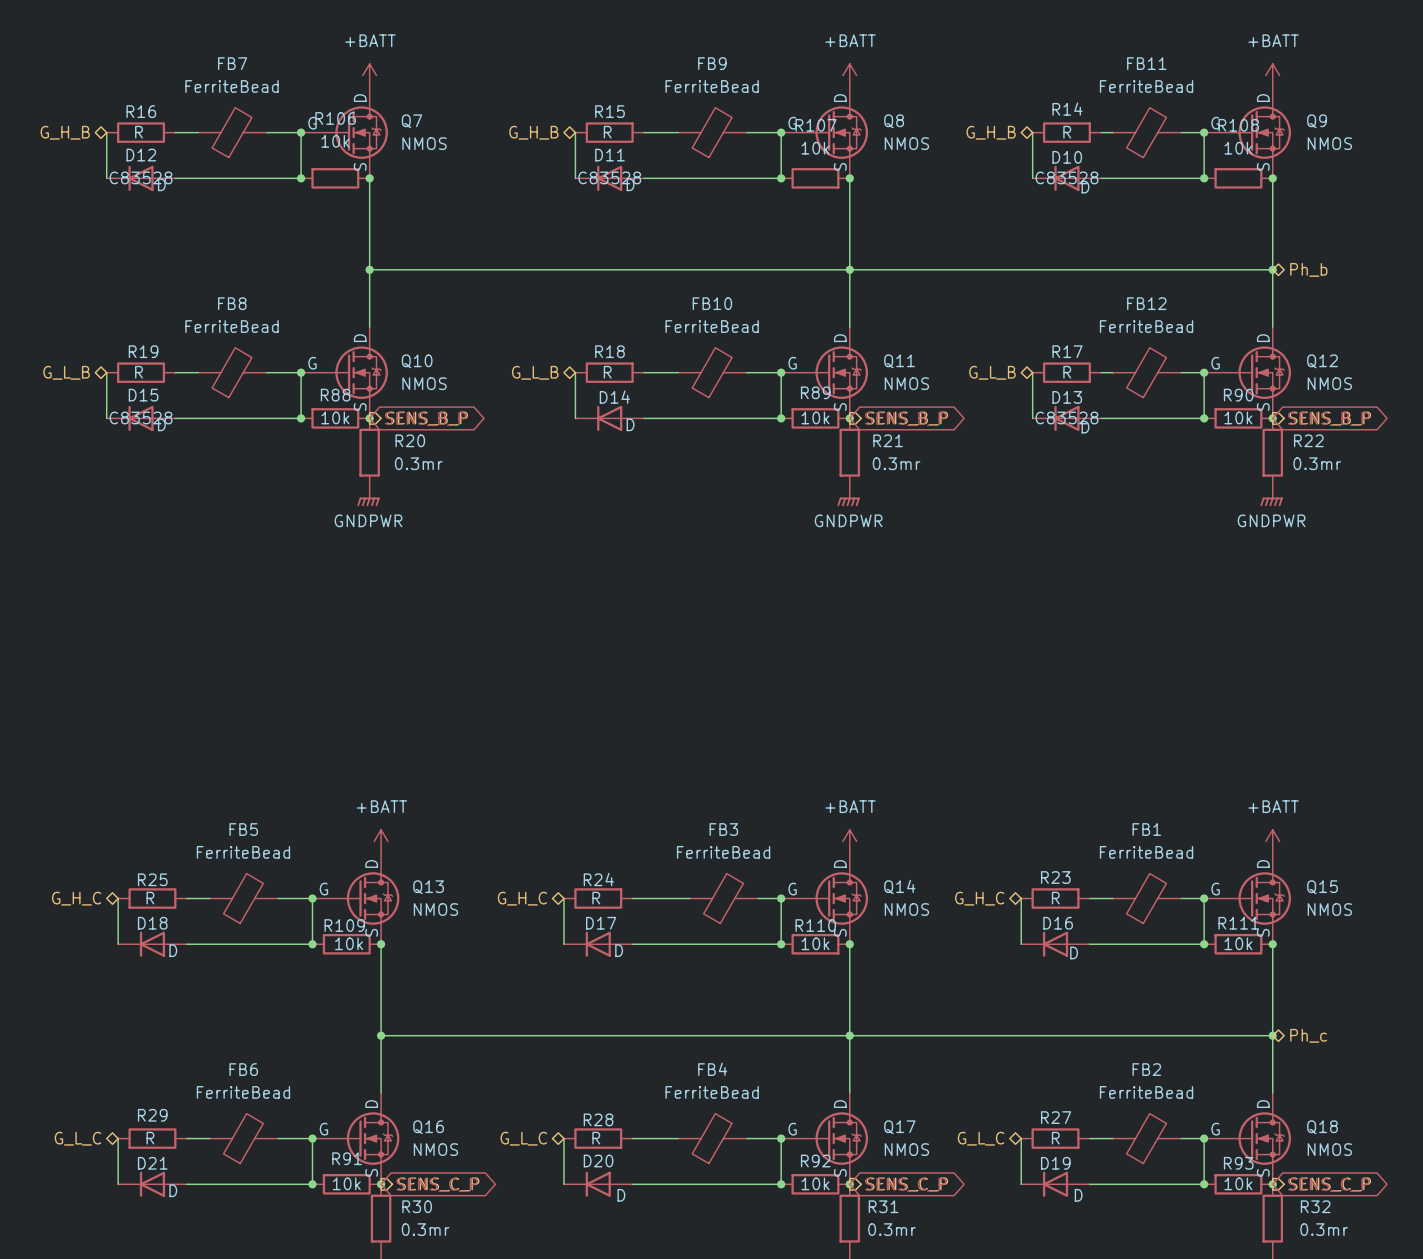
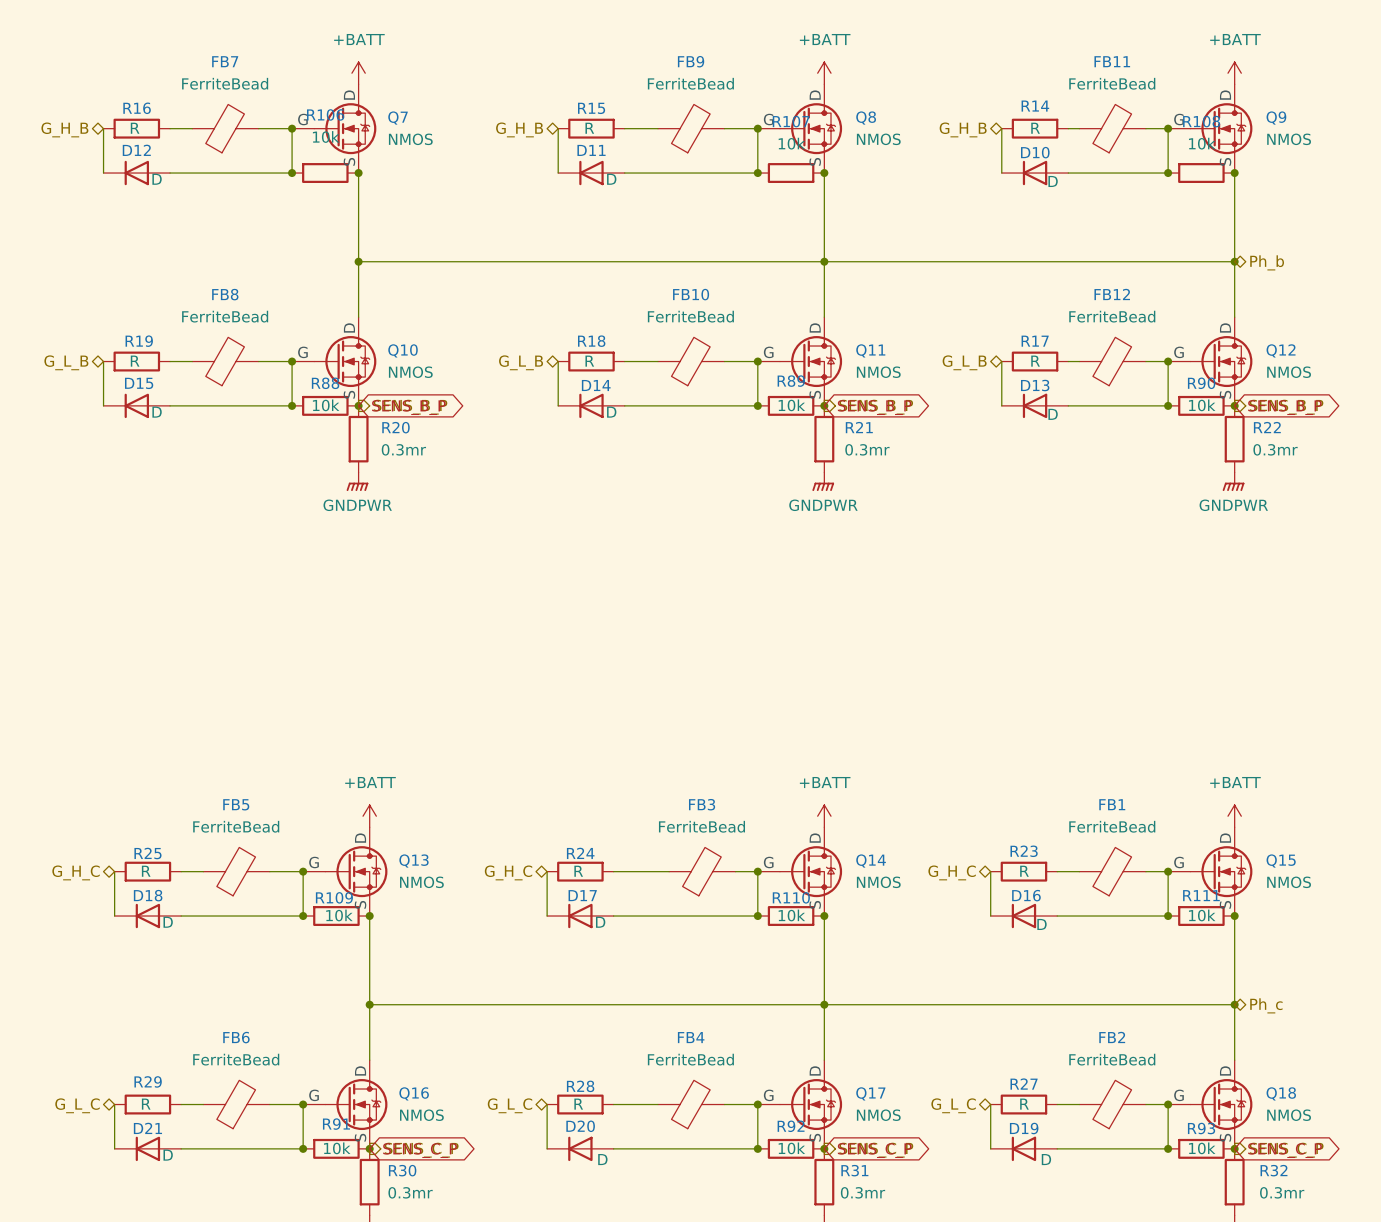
D12 text: C83528 (141, 177) -> none
D11 text: C83528 (609, 177) -> none
D10 text: C83528 (1066, 177) -> none
D15 text: C83528 (141, 417) -> none
D13 text: C83528 (1066, 417) -> none

